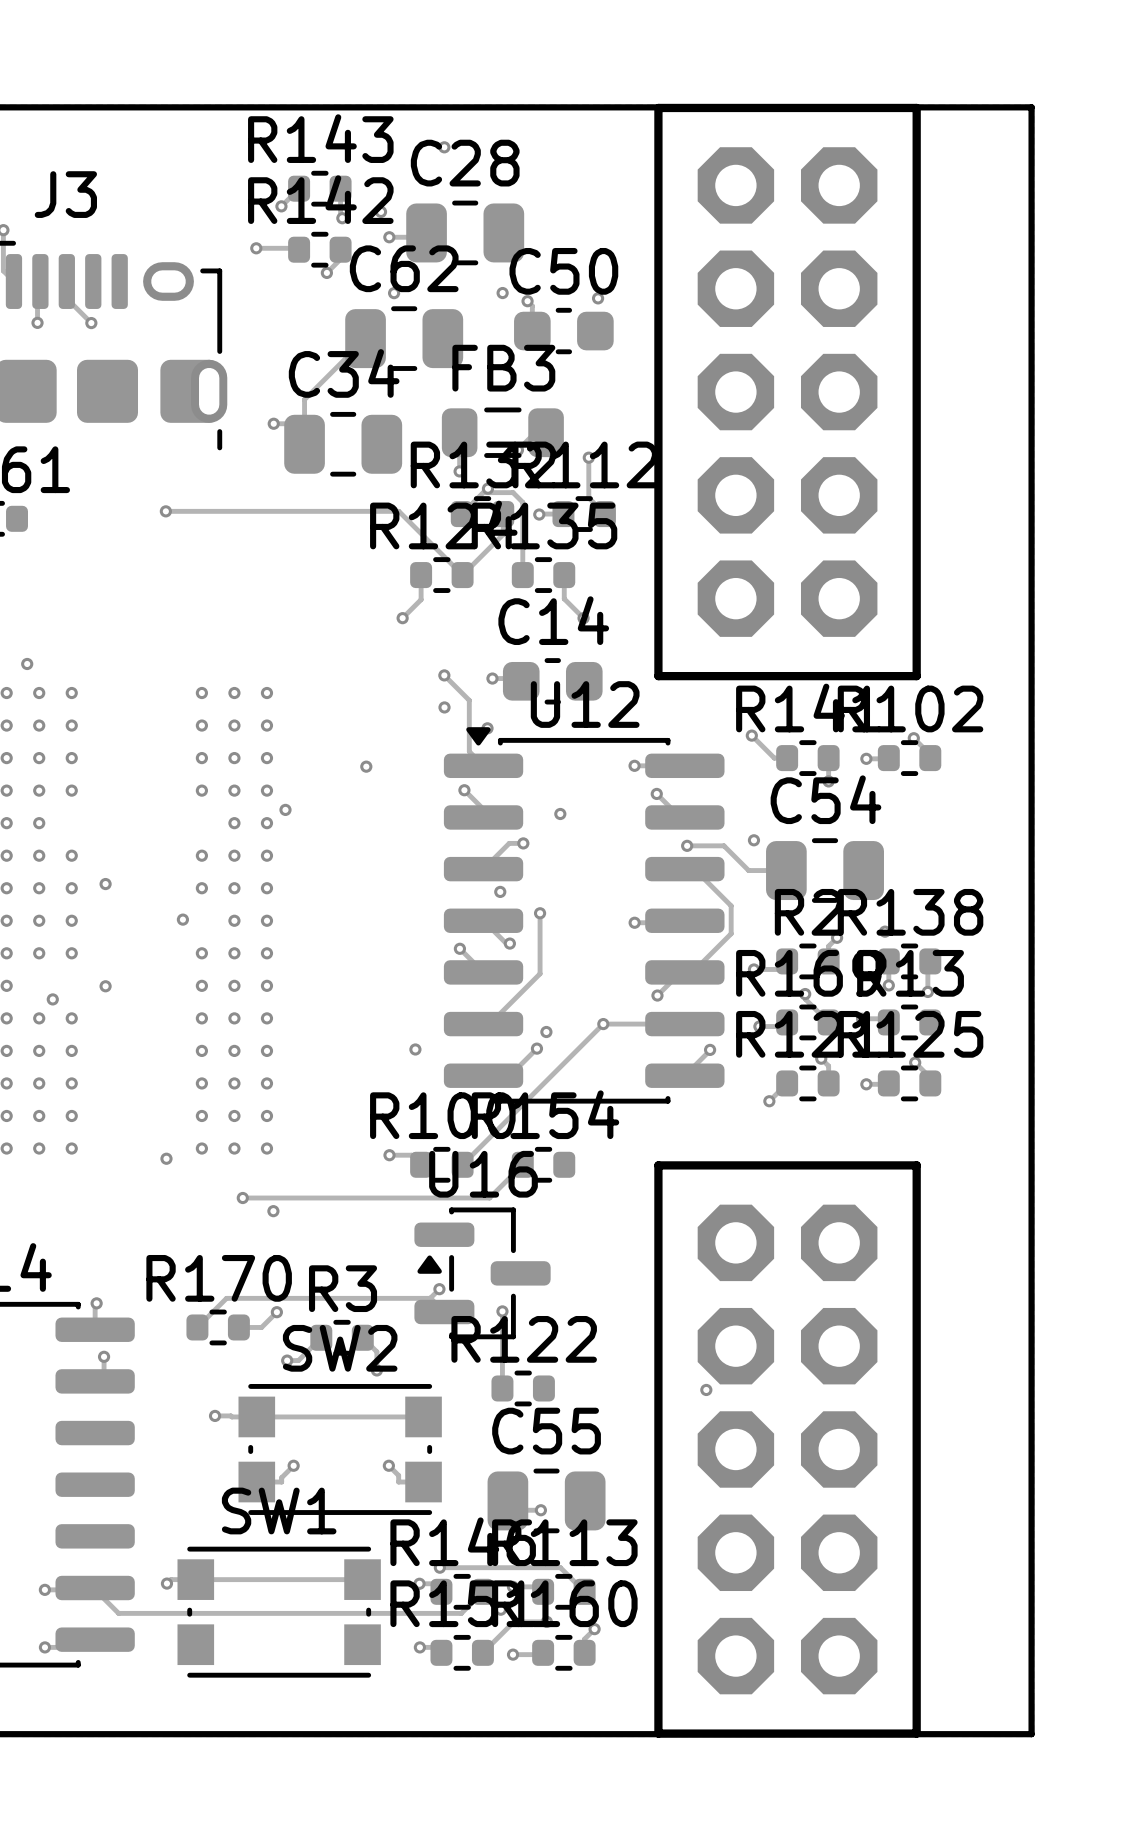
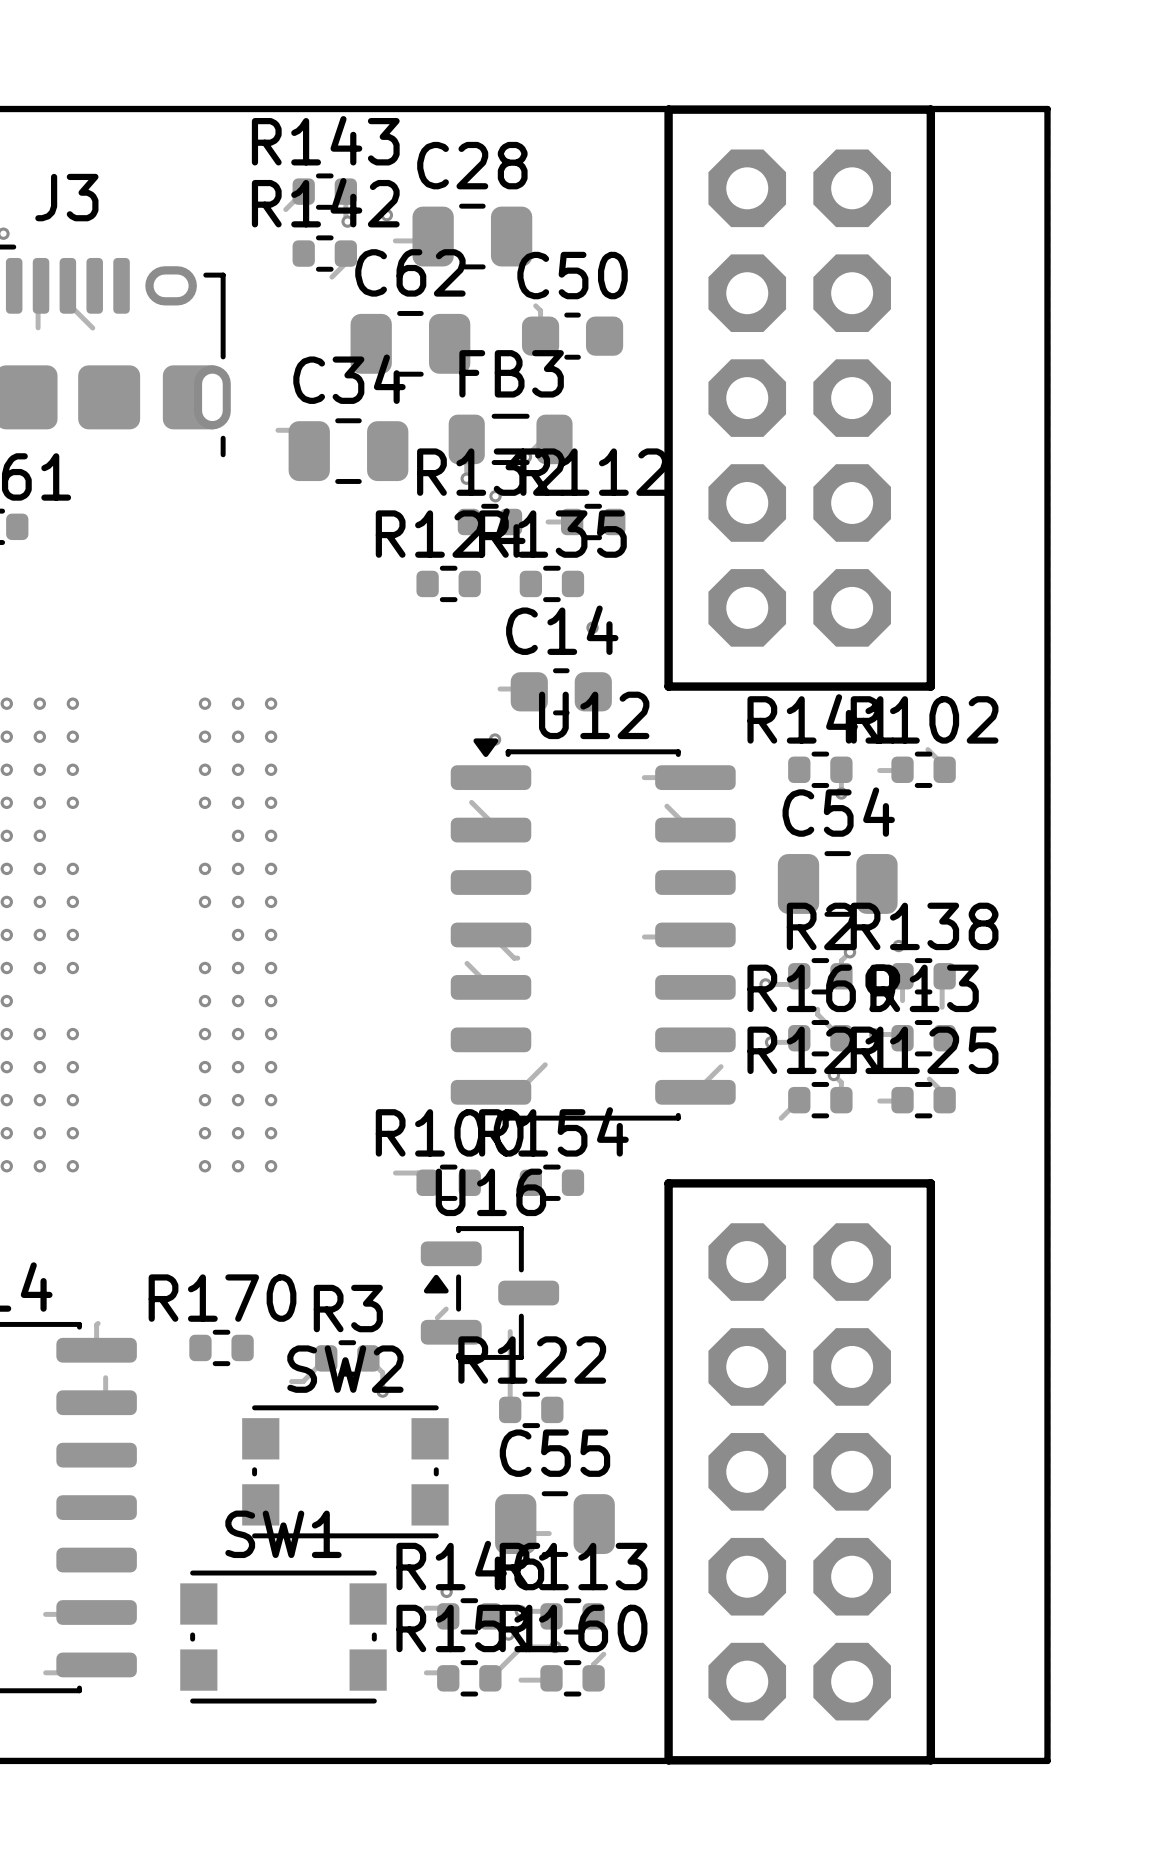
via: (444, 147) -> none
via: (281, 206) -> none
track: (3, 230) (3, 270) (13, 281) -> none
via: (389, 237) -> none
track: (256, 248) (299, 249) -> none
via: (256, 248) -> none
via: (326, 272) -> none
via: (394, 293) -> none
via: (502, 293) -> none
via: (598, 298) -> none
via: (527, 301) -> none
via: (37, 322) -> none
via: (91, 323) -> none
track: (365, 338) (304, 399) (304, 444) -> none
via: (273, 423) -> none
track: (588, 457) (588, 497) (604, 514) -> none
via: (588, 457) -> none
track: (165, 511) (398, 511) (462, 575) (503, 534) (503, 514) -> none
via: (165, 511) -> none
track: (461, 514) (483, 492) (513, 492) (522, 502) (522, 575) -> none
via: (539, 514) -> none
track: (421, 575) (421, 599) (402, 618) -> none
track: (564, 575) (564, 598) (583, 618) -> none
via: (402, 618) -> none
via: (27, 663) -> none
track: (444, 675) (469, 700) (469, 751) (483, 765) -> none
via: (444, 675) -> none
via: (492, 678) -> none
via: (444, 707) -> none
track: (751, 735) (774, 758) (787, 758) -> none
via: (751, 735) -> none
via: (913, 738) -> none
via: (866, 758) -> none
via: (634, 765) -> none
via: (366, 766) -> none
via: (464, 790) -> none
via: (656, 793) -> none
via: (285, 809) -> none
via: (560, 813) -> none
via: (753, 840) -> none
track: (523, 843) (509, 843) (483, 869) -> none
via: (523, 843) -> none
track: (687, 845) (723, 845) (748, 870) (786, 870) -> none
via: (687, 845) -> none
track: (684, 869) (694, 869) (731, 905) (731, 933) (692, 972) (680, 972) (657, 995) -> none
via: (105, 884) -> none
via: (500, 891) -> none
track: (540, 913) (540, 973) (489, 1024) (483, 1024) -> none
via: (540, 913) -> none
via: (182, 919) -> none
via: (634, 922) -> none
via: (509, 943) -> none
via: (459, 948) -> none
via: (888, 985) -> none
via: (105, 986) -> none
via: (927, 991) -> none
via: (805, 994) -> none
via: (657, 995) -> none
via: (52, 999) -> none
via: (603, 1024) -> none
track: (684, 1024) (603, 1024) (462, 1164) -> none
via: (546, 1032) -> none
via: (536, 1048) -> none
via: (415, 1049) -> none
via: (710, 1049) -> none
via: (915, 1062) -> none
via: (866, 1084) -> none
via: (769, 1101) -> none
via: (389, 1155) -> none
via: (166, 1158) -> none
track: (522, 1164) (489, 1198) (242, 1198) -> none
via: (242, 1198) -> none
via: (273, 1211) -> none
via: (439, 1289) -> none
via: (96, 1303) -> none
via: (502, 1311) -> none
track: (276, 1312) (261, 1327) (238, 1327) -> none
via: (276, 1312) -> none
track: (444, 1312) (430, 1298) (226, 1298) (197, 1327) -> none
via: (104, 1356) -> none
via: (287, 1360) -> none
via: (706, 1389) -> none
track: (215, 1415) (423, 1416) -> none
via: (215, 1415) -> none
track: (293, 1465) (281, 1477) (281, 1482) (256, 1482) -> none
via: (293, 1465) -> none
track: (388, 1465) (398, 1475) (398, 1482) (423, 1482) -> none
via: (388, 1465) -> none
via: (540, 1510) -> none
track: (439, 1567) (560, 1567) (584, 1591) -> none
track: (362, 1579) (170, 1579) (166, 1583) -> none
via: (166, 1583) -> none
via: (419, 1583) -> none
track: (95, 1588) (118, 1613) (461, 1613) (482, 1591) (500, 1609) -> none
via: (44, 1589) -> none
via: (594, 1629) -> none
via: (44, 1647) -> none
via: (419, 1647) -> none
via: (513, 1654) -> none

